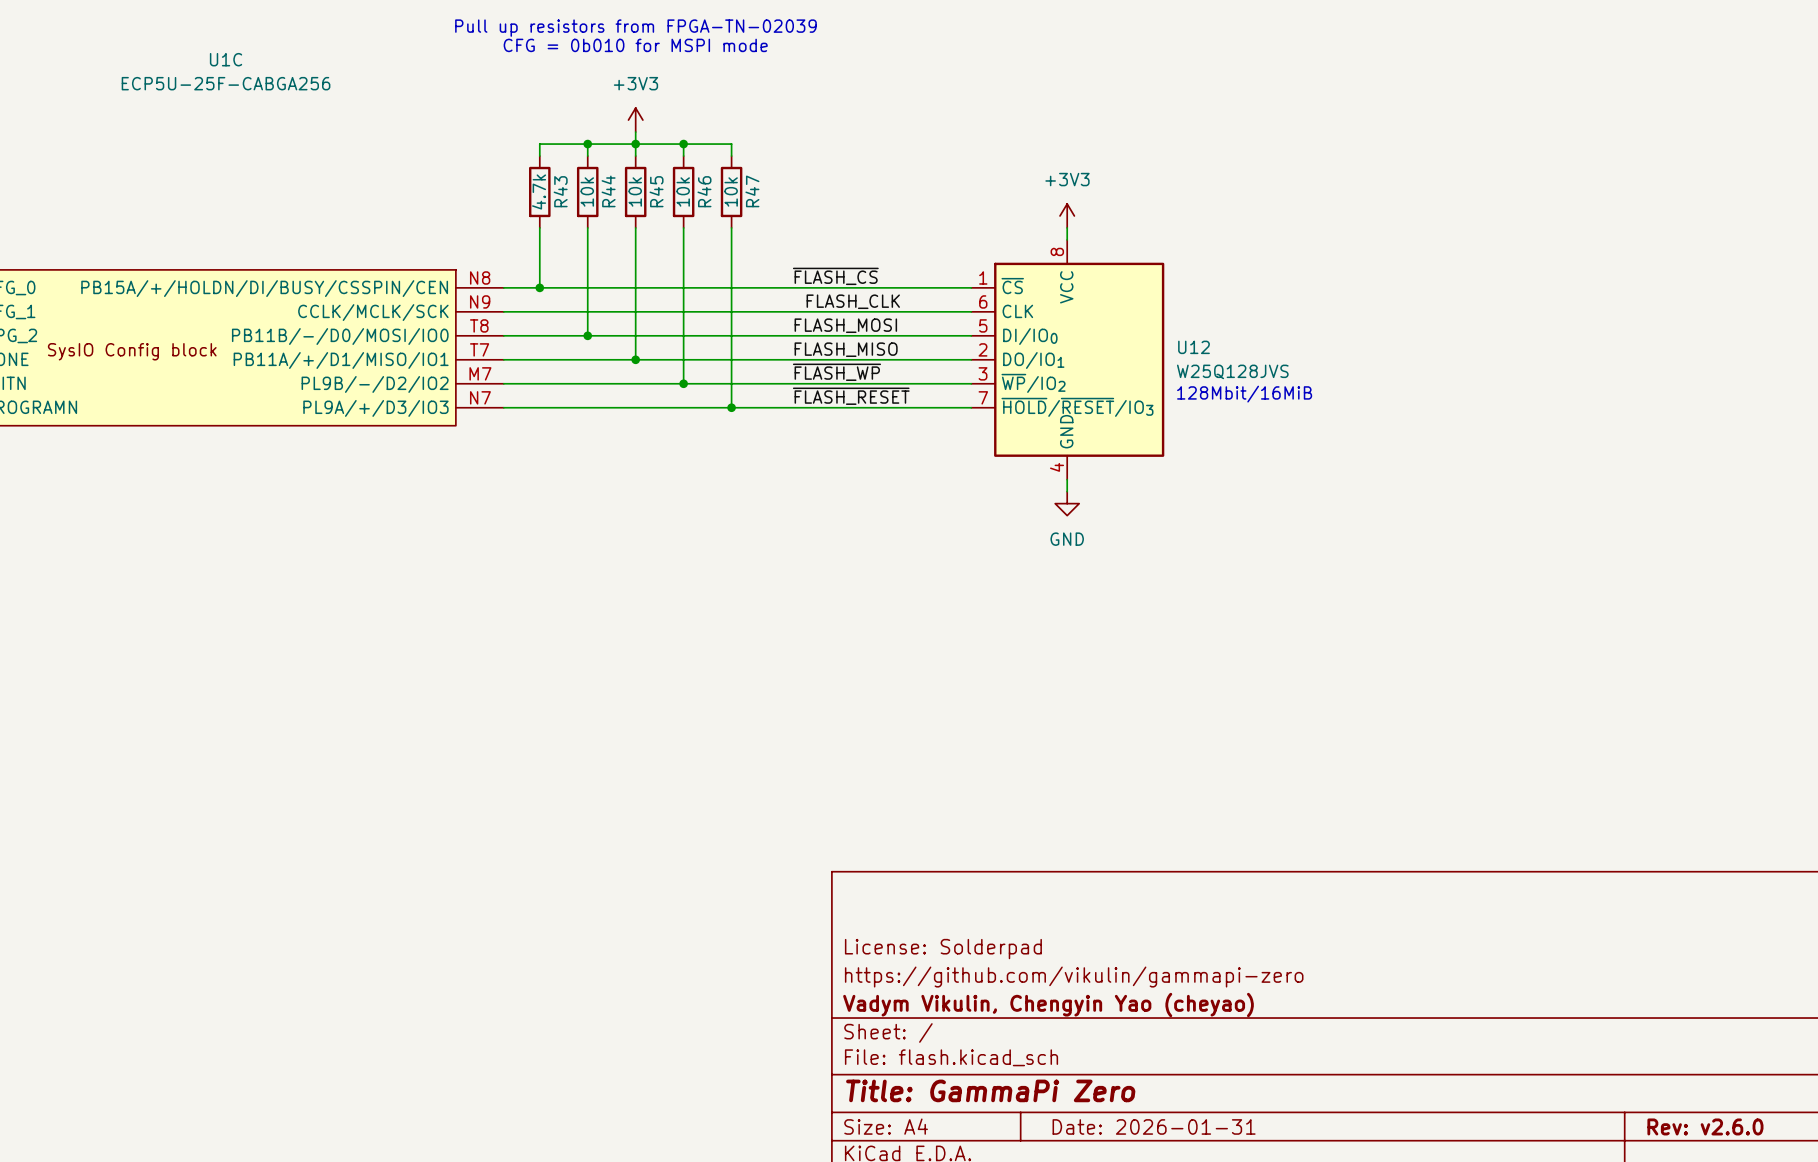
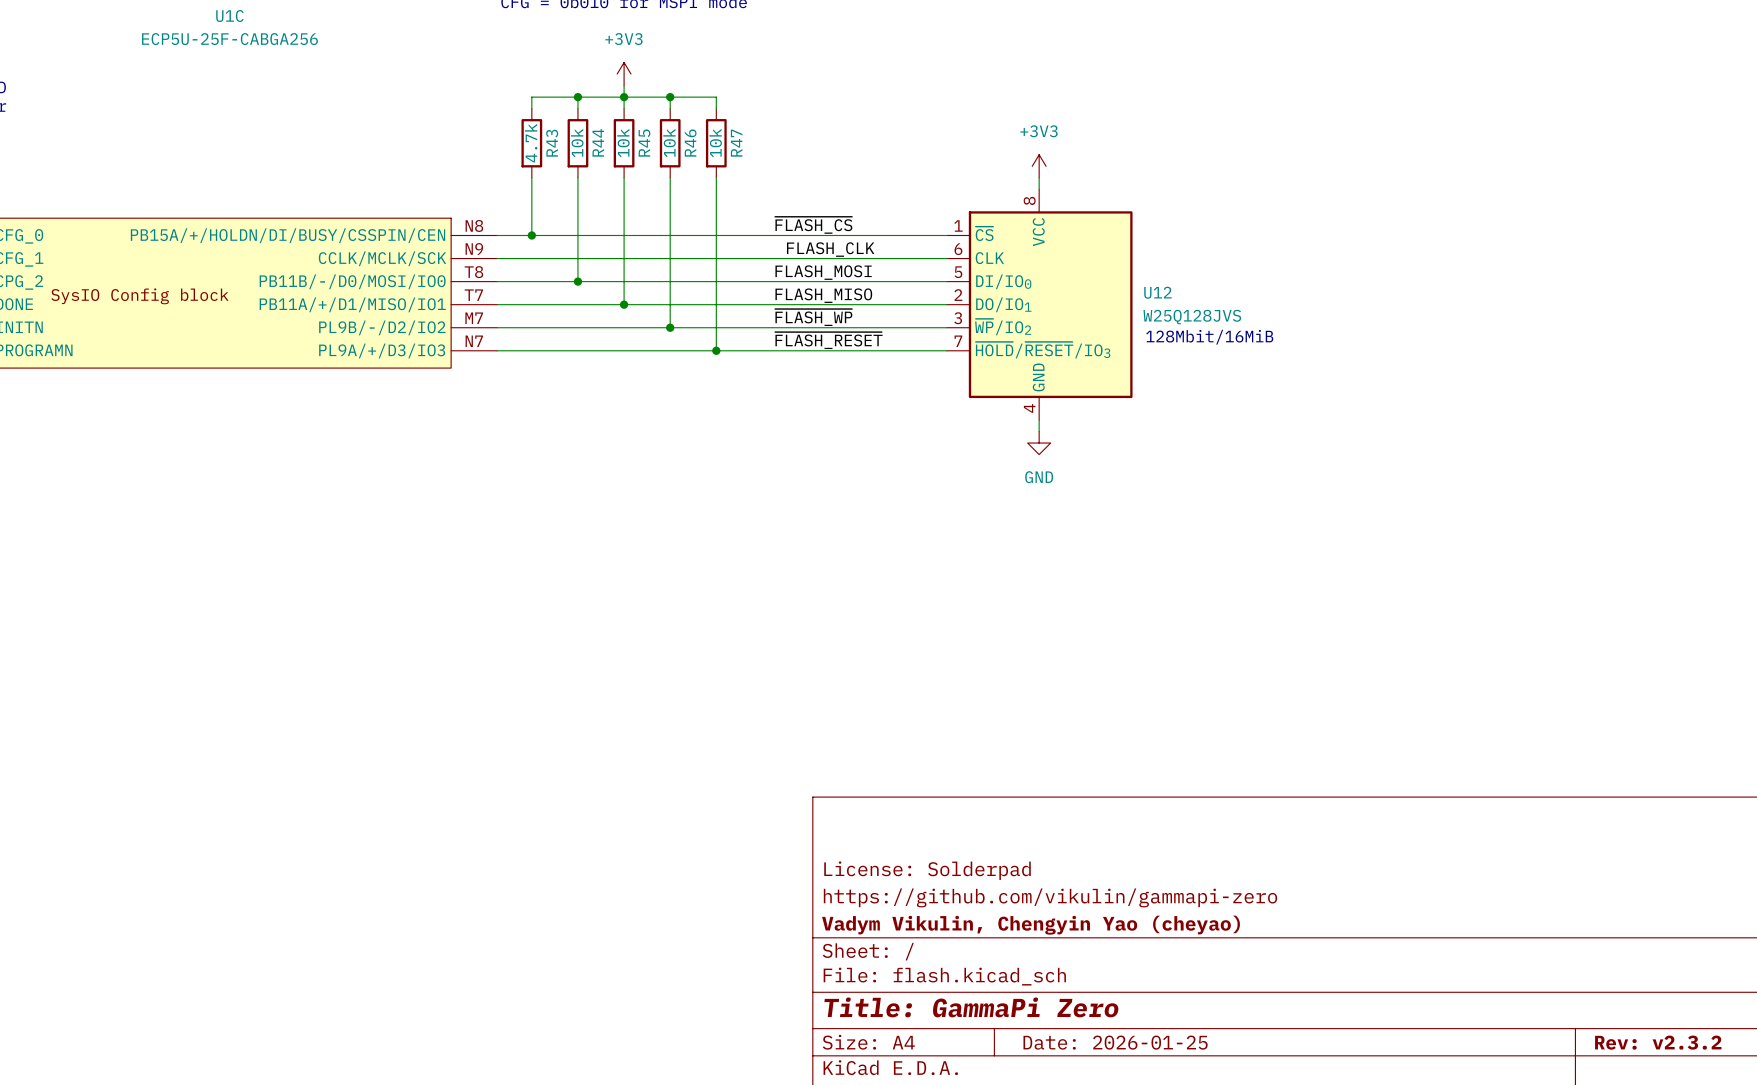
title block: Date: 2026-01-31 (1154, 1126) -> Date: 2026-01-25 (1115, 1042)
title block: Rev: v2.6.0 (1705, 1126) -> Rev: v2.3.2 (1658, 1042)

